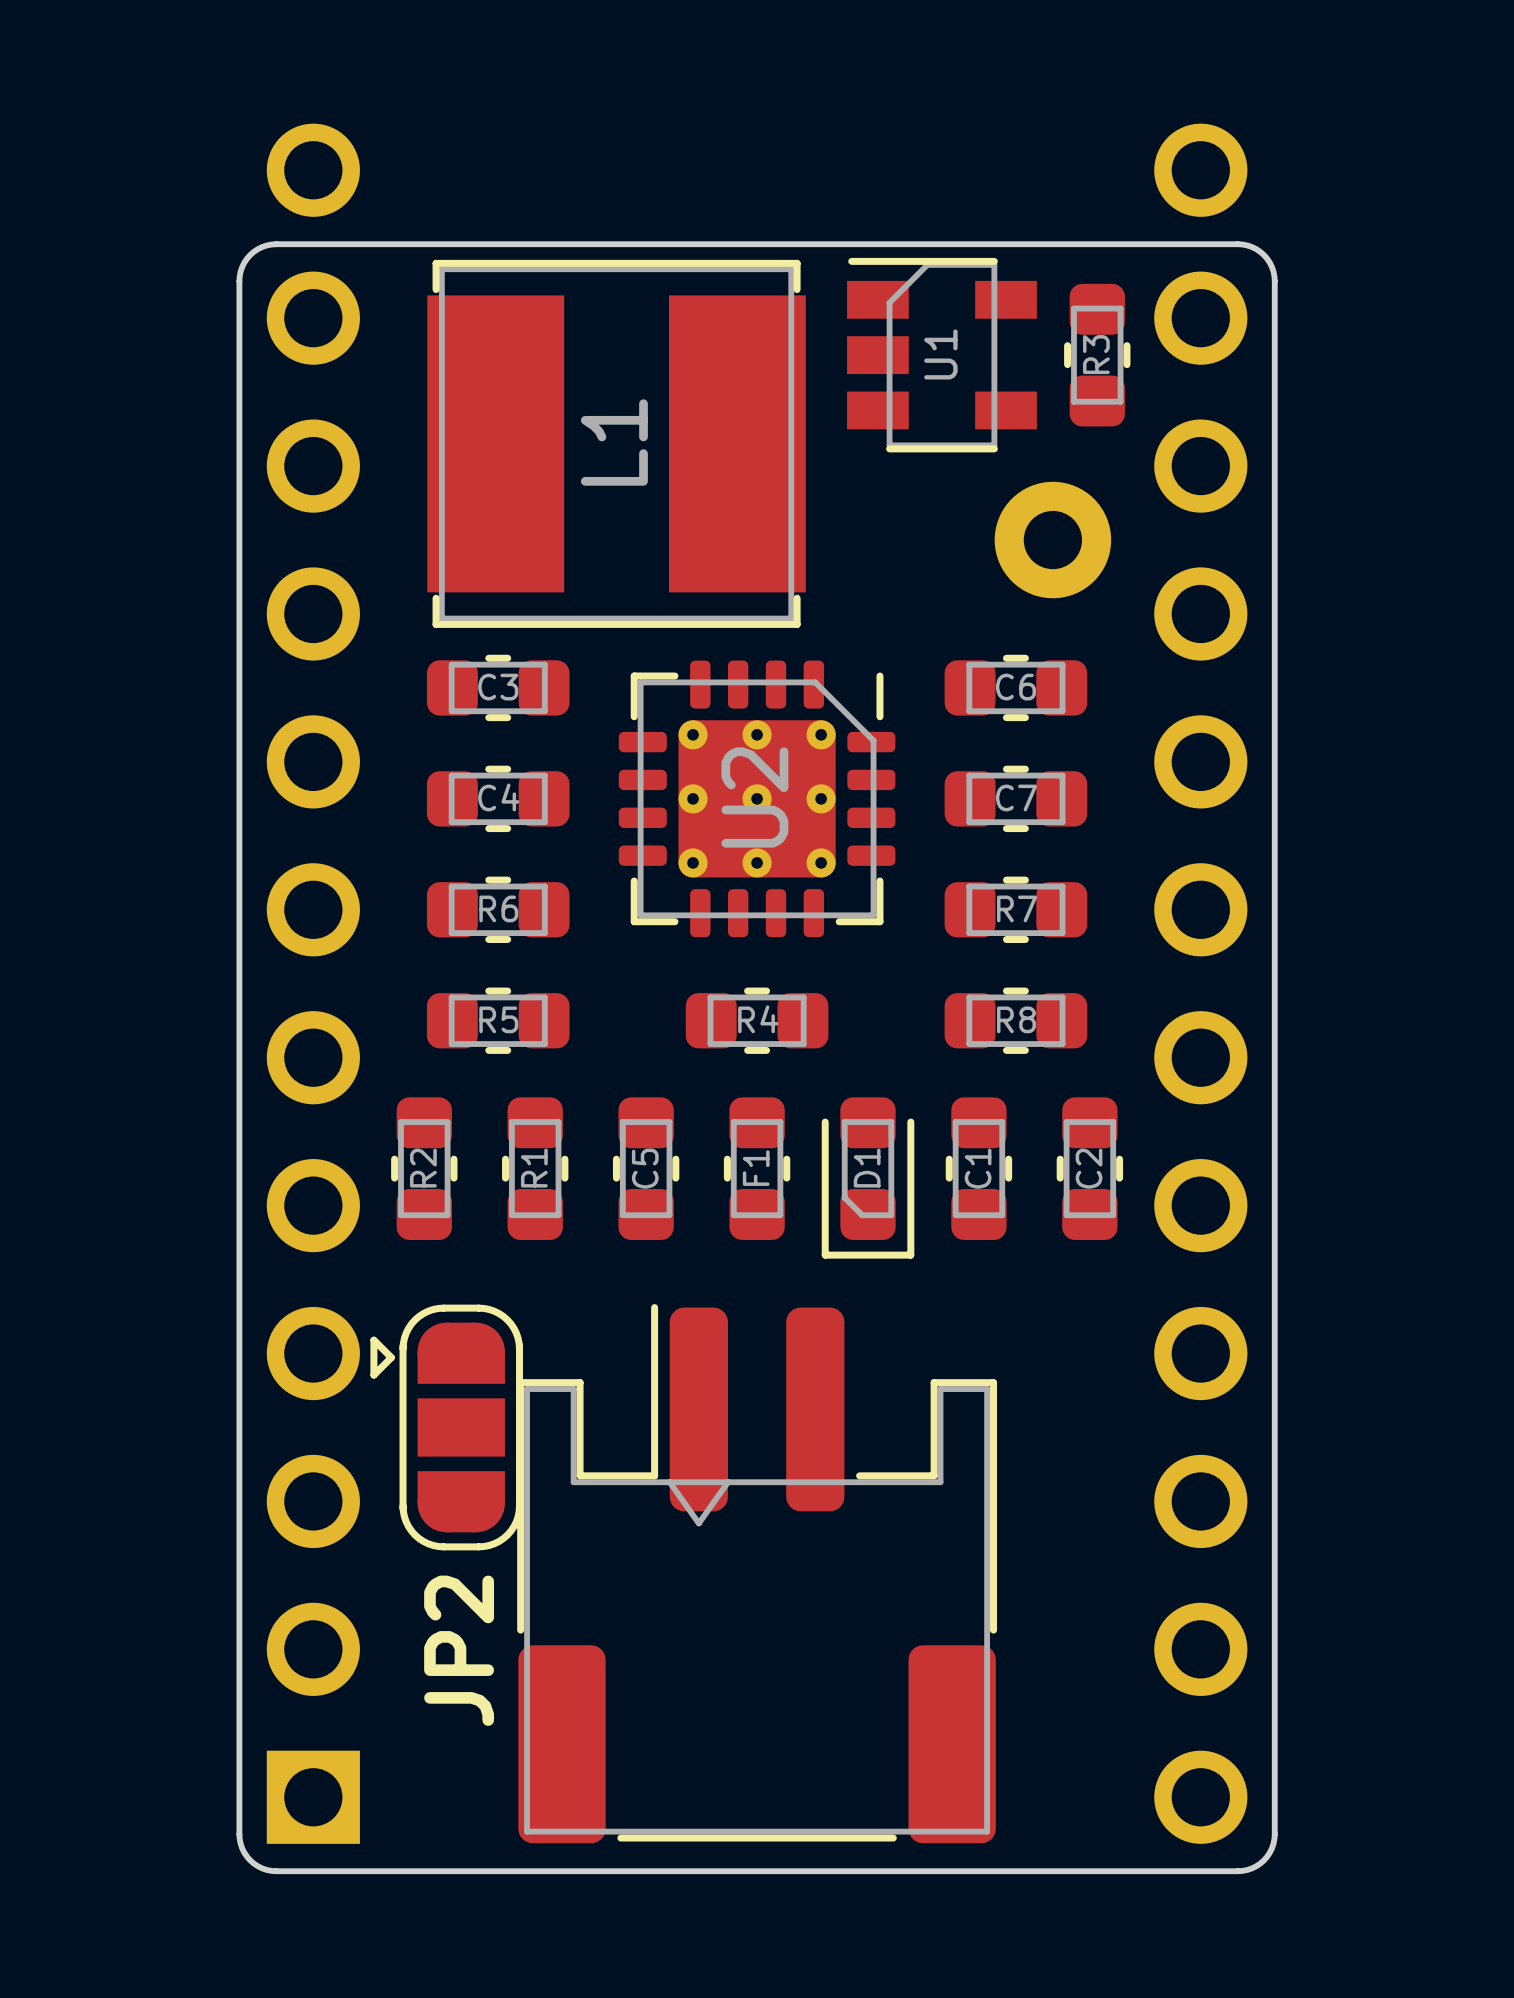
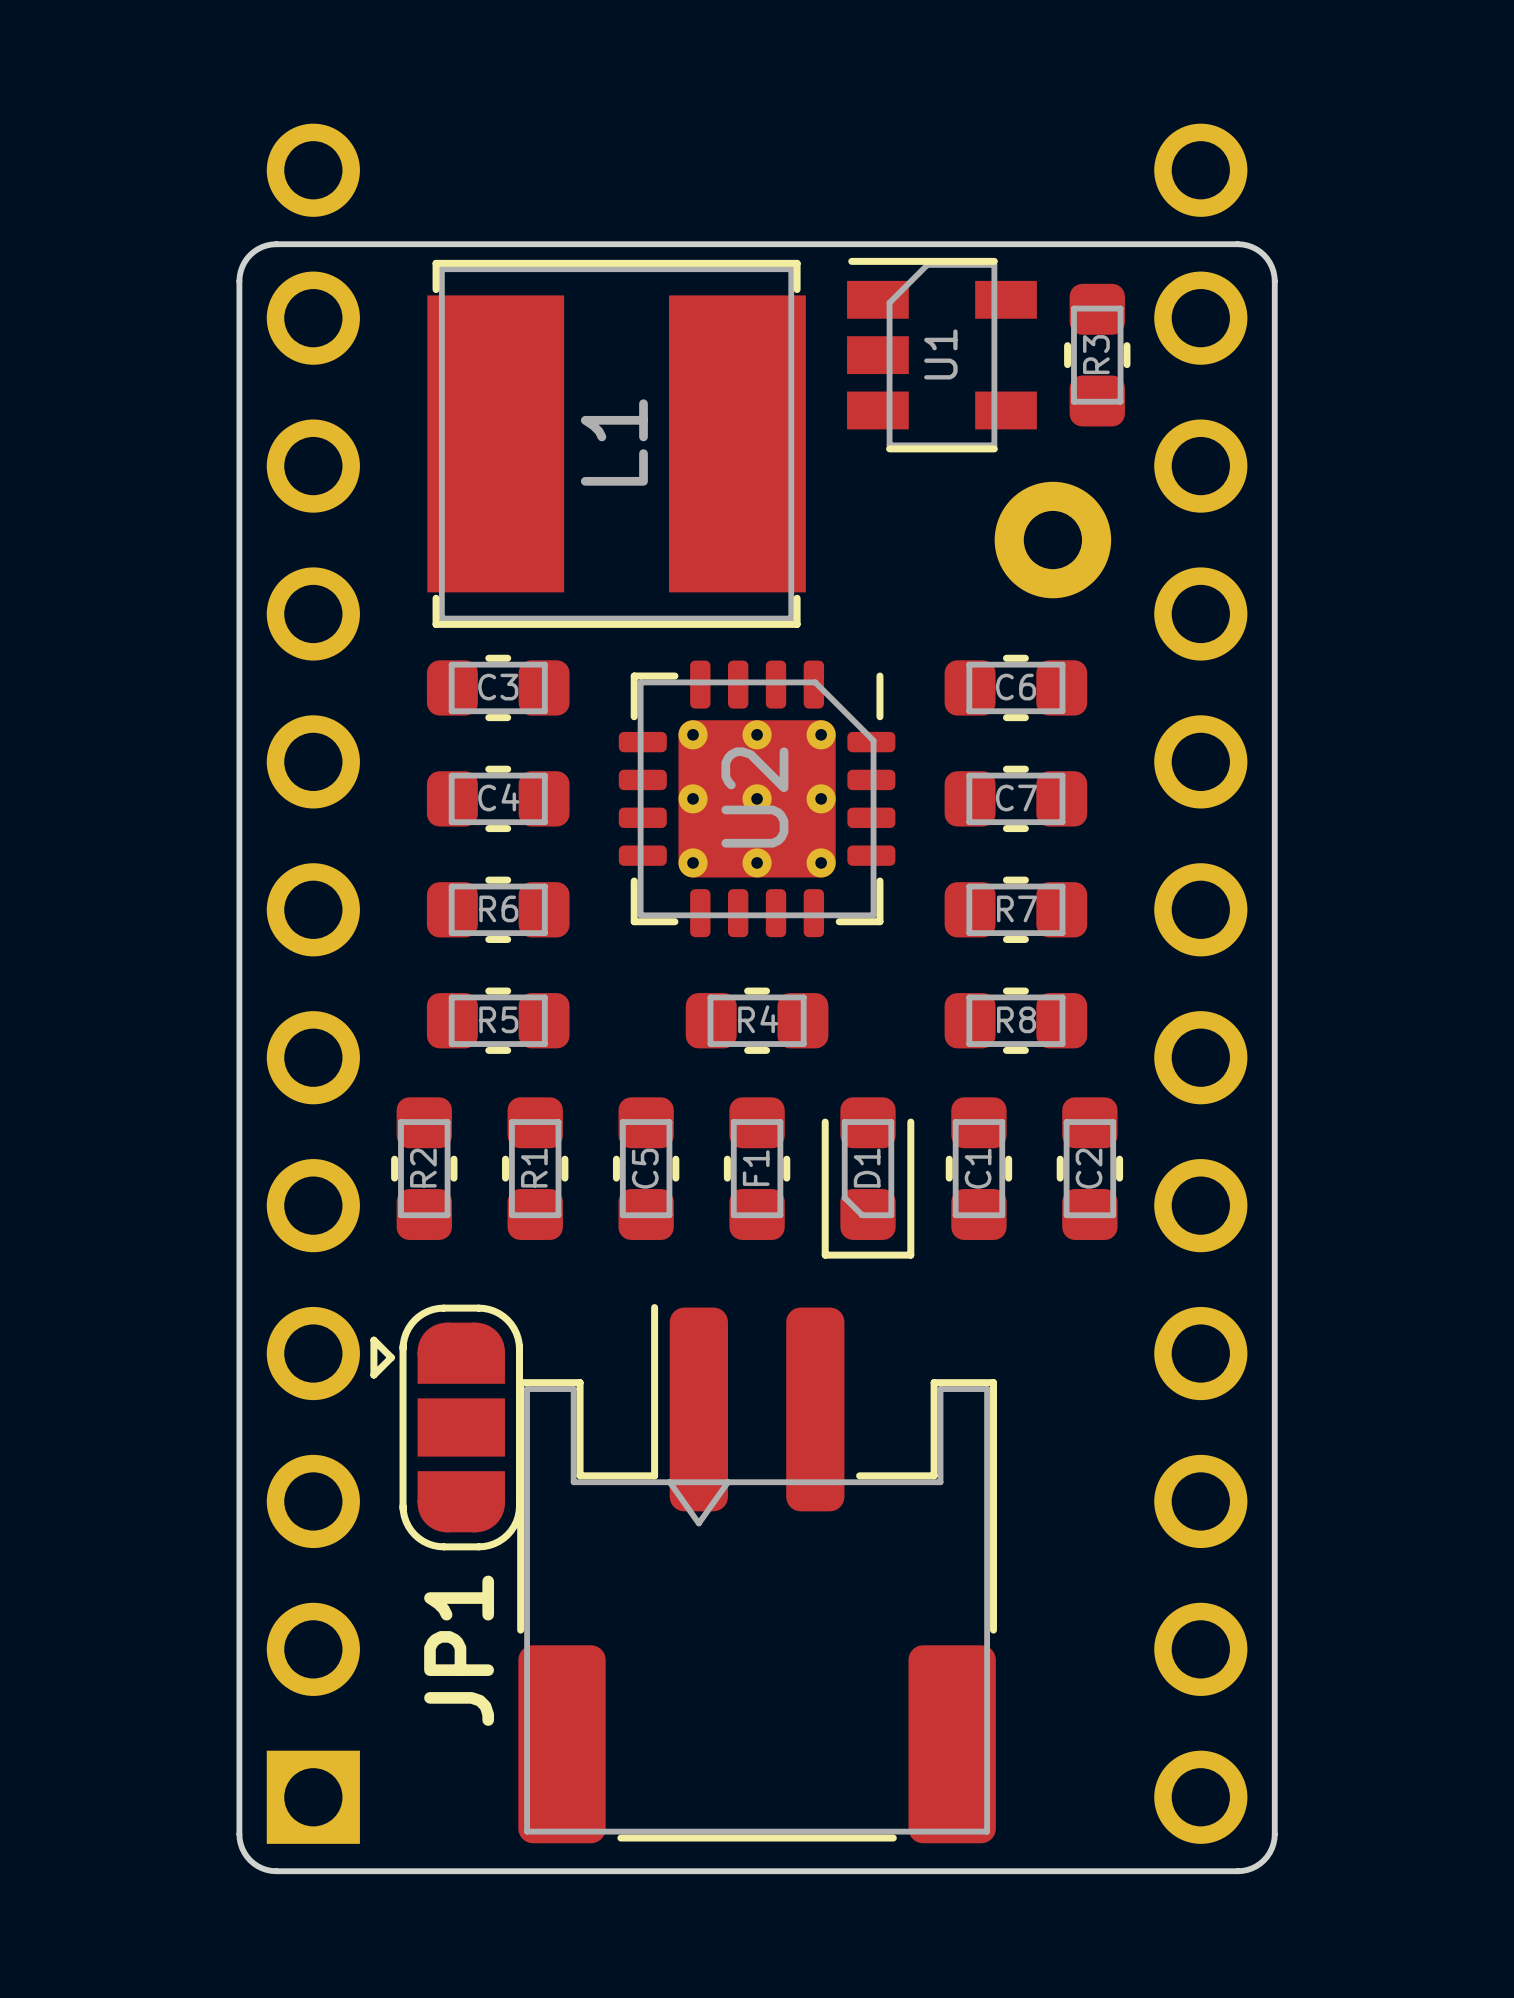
JP2 name: JP2 (459, 1650) -> JP1 (459, 1650)

